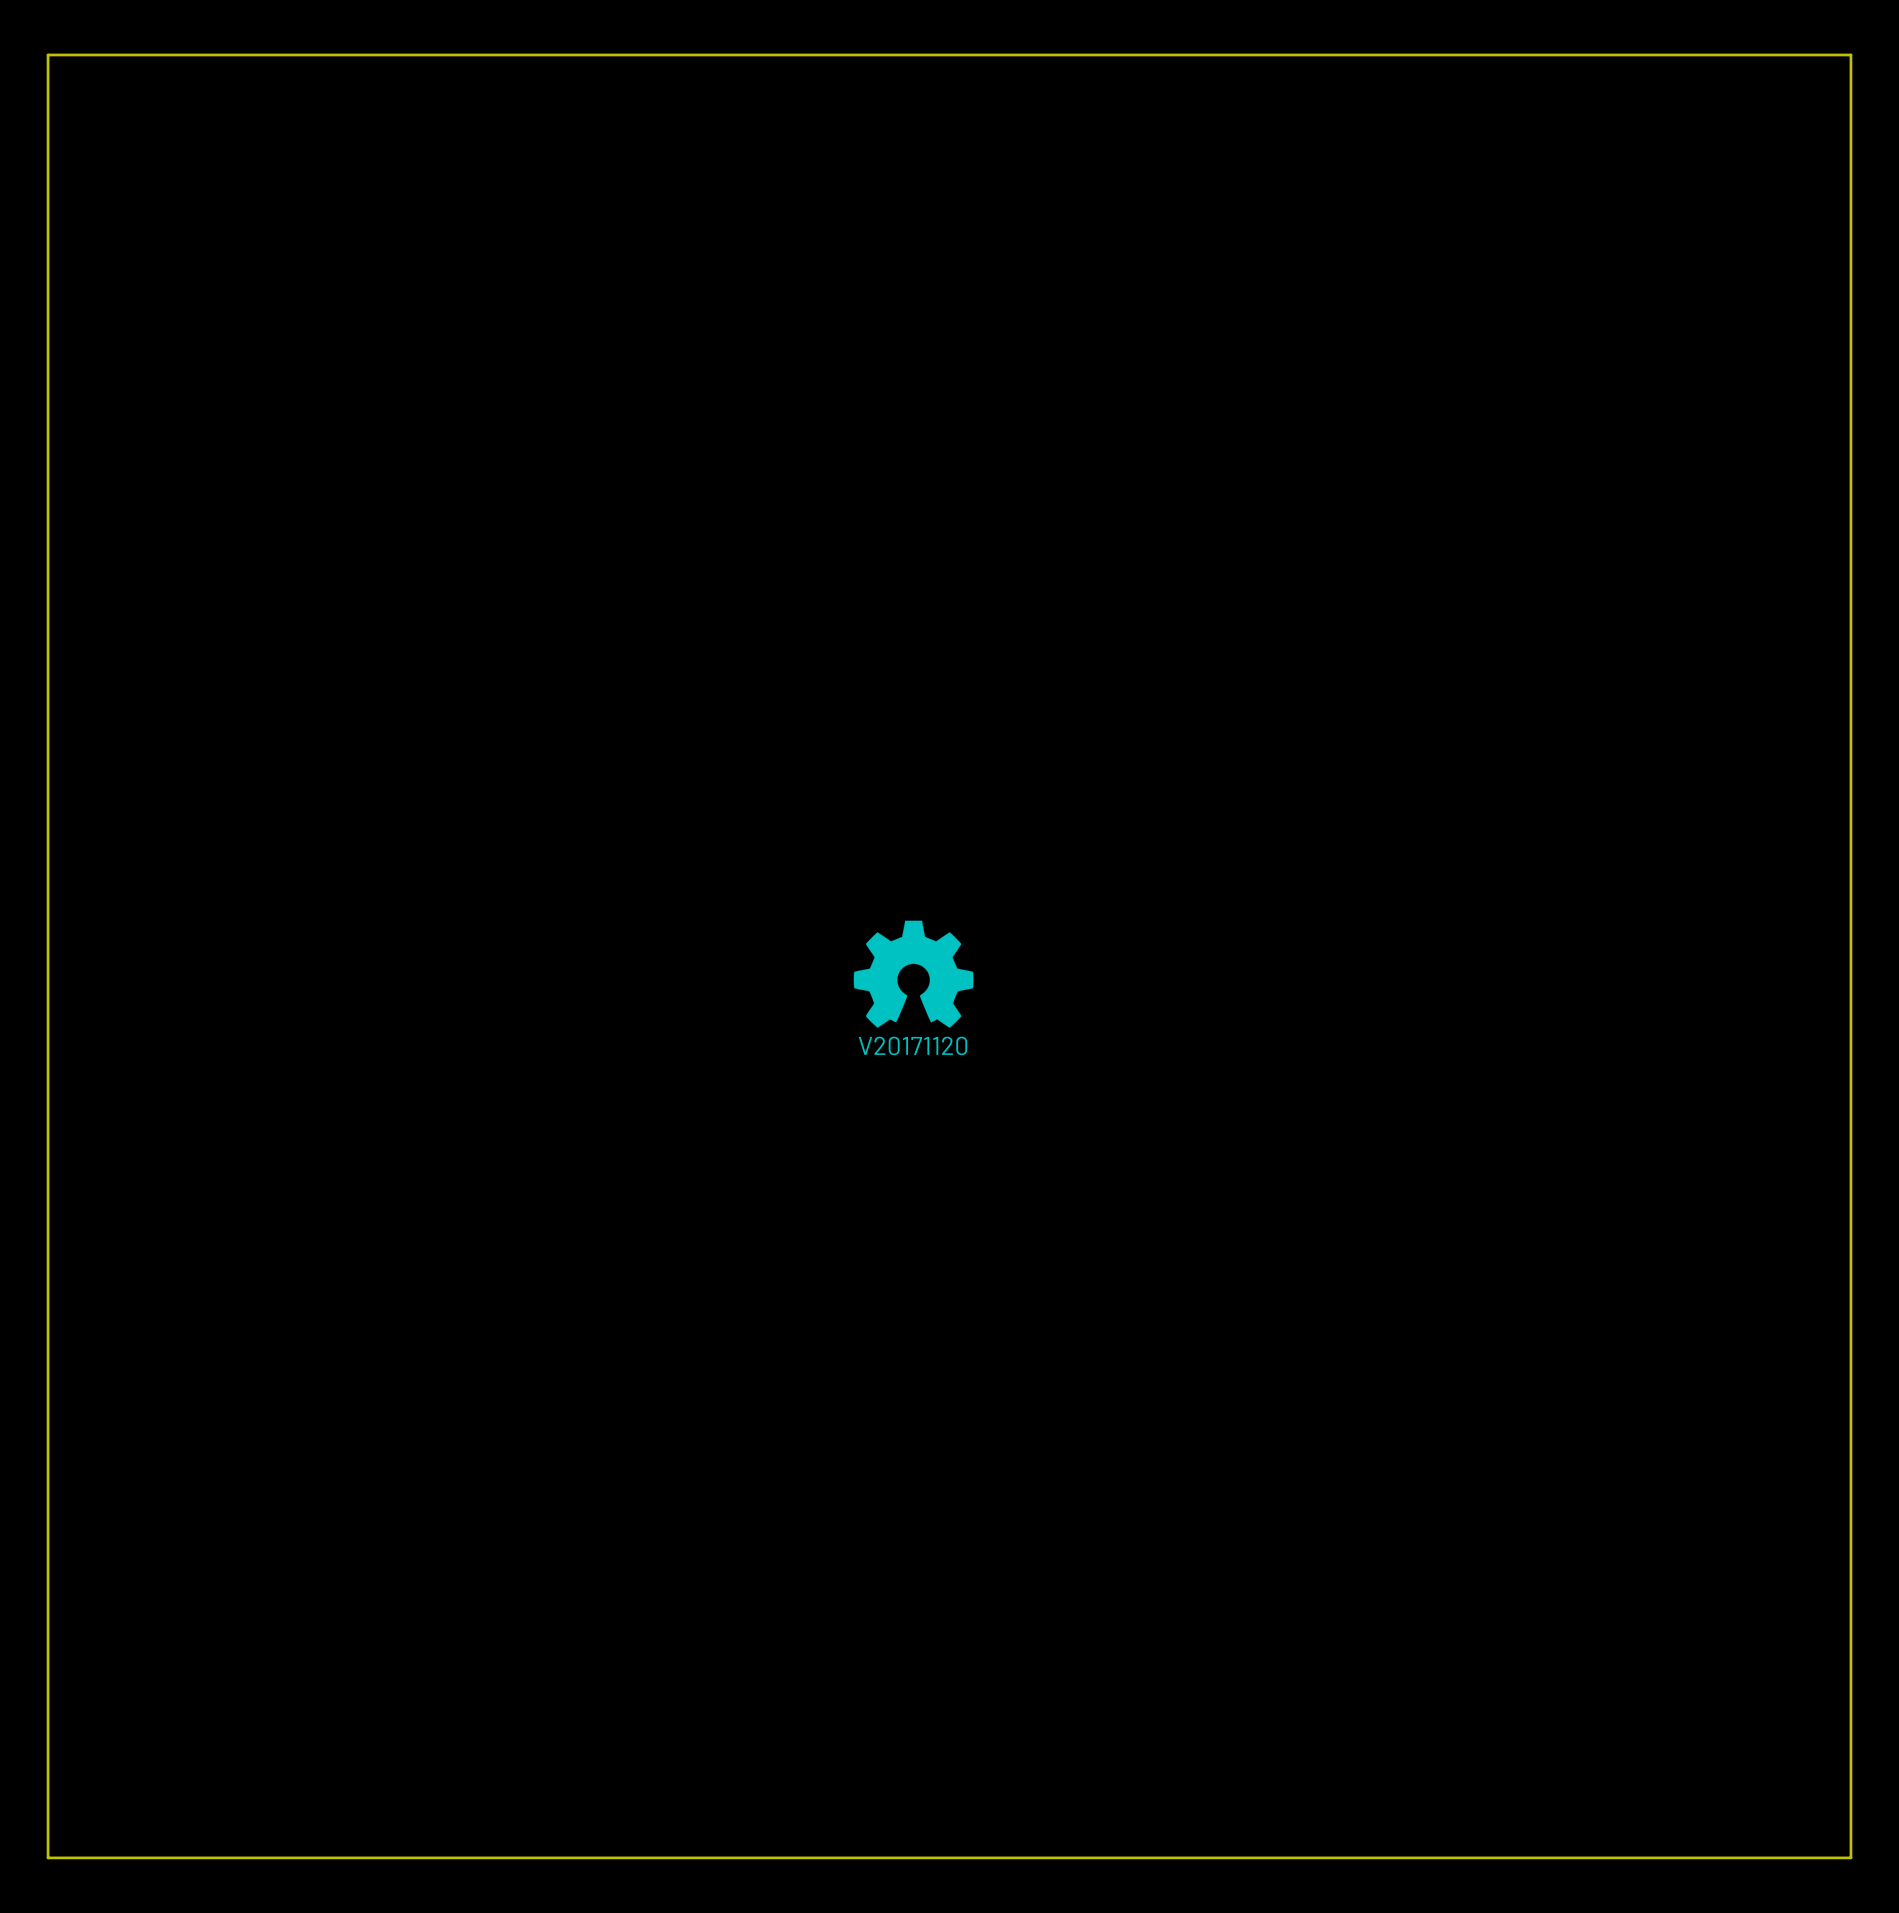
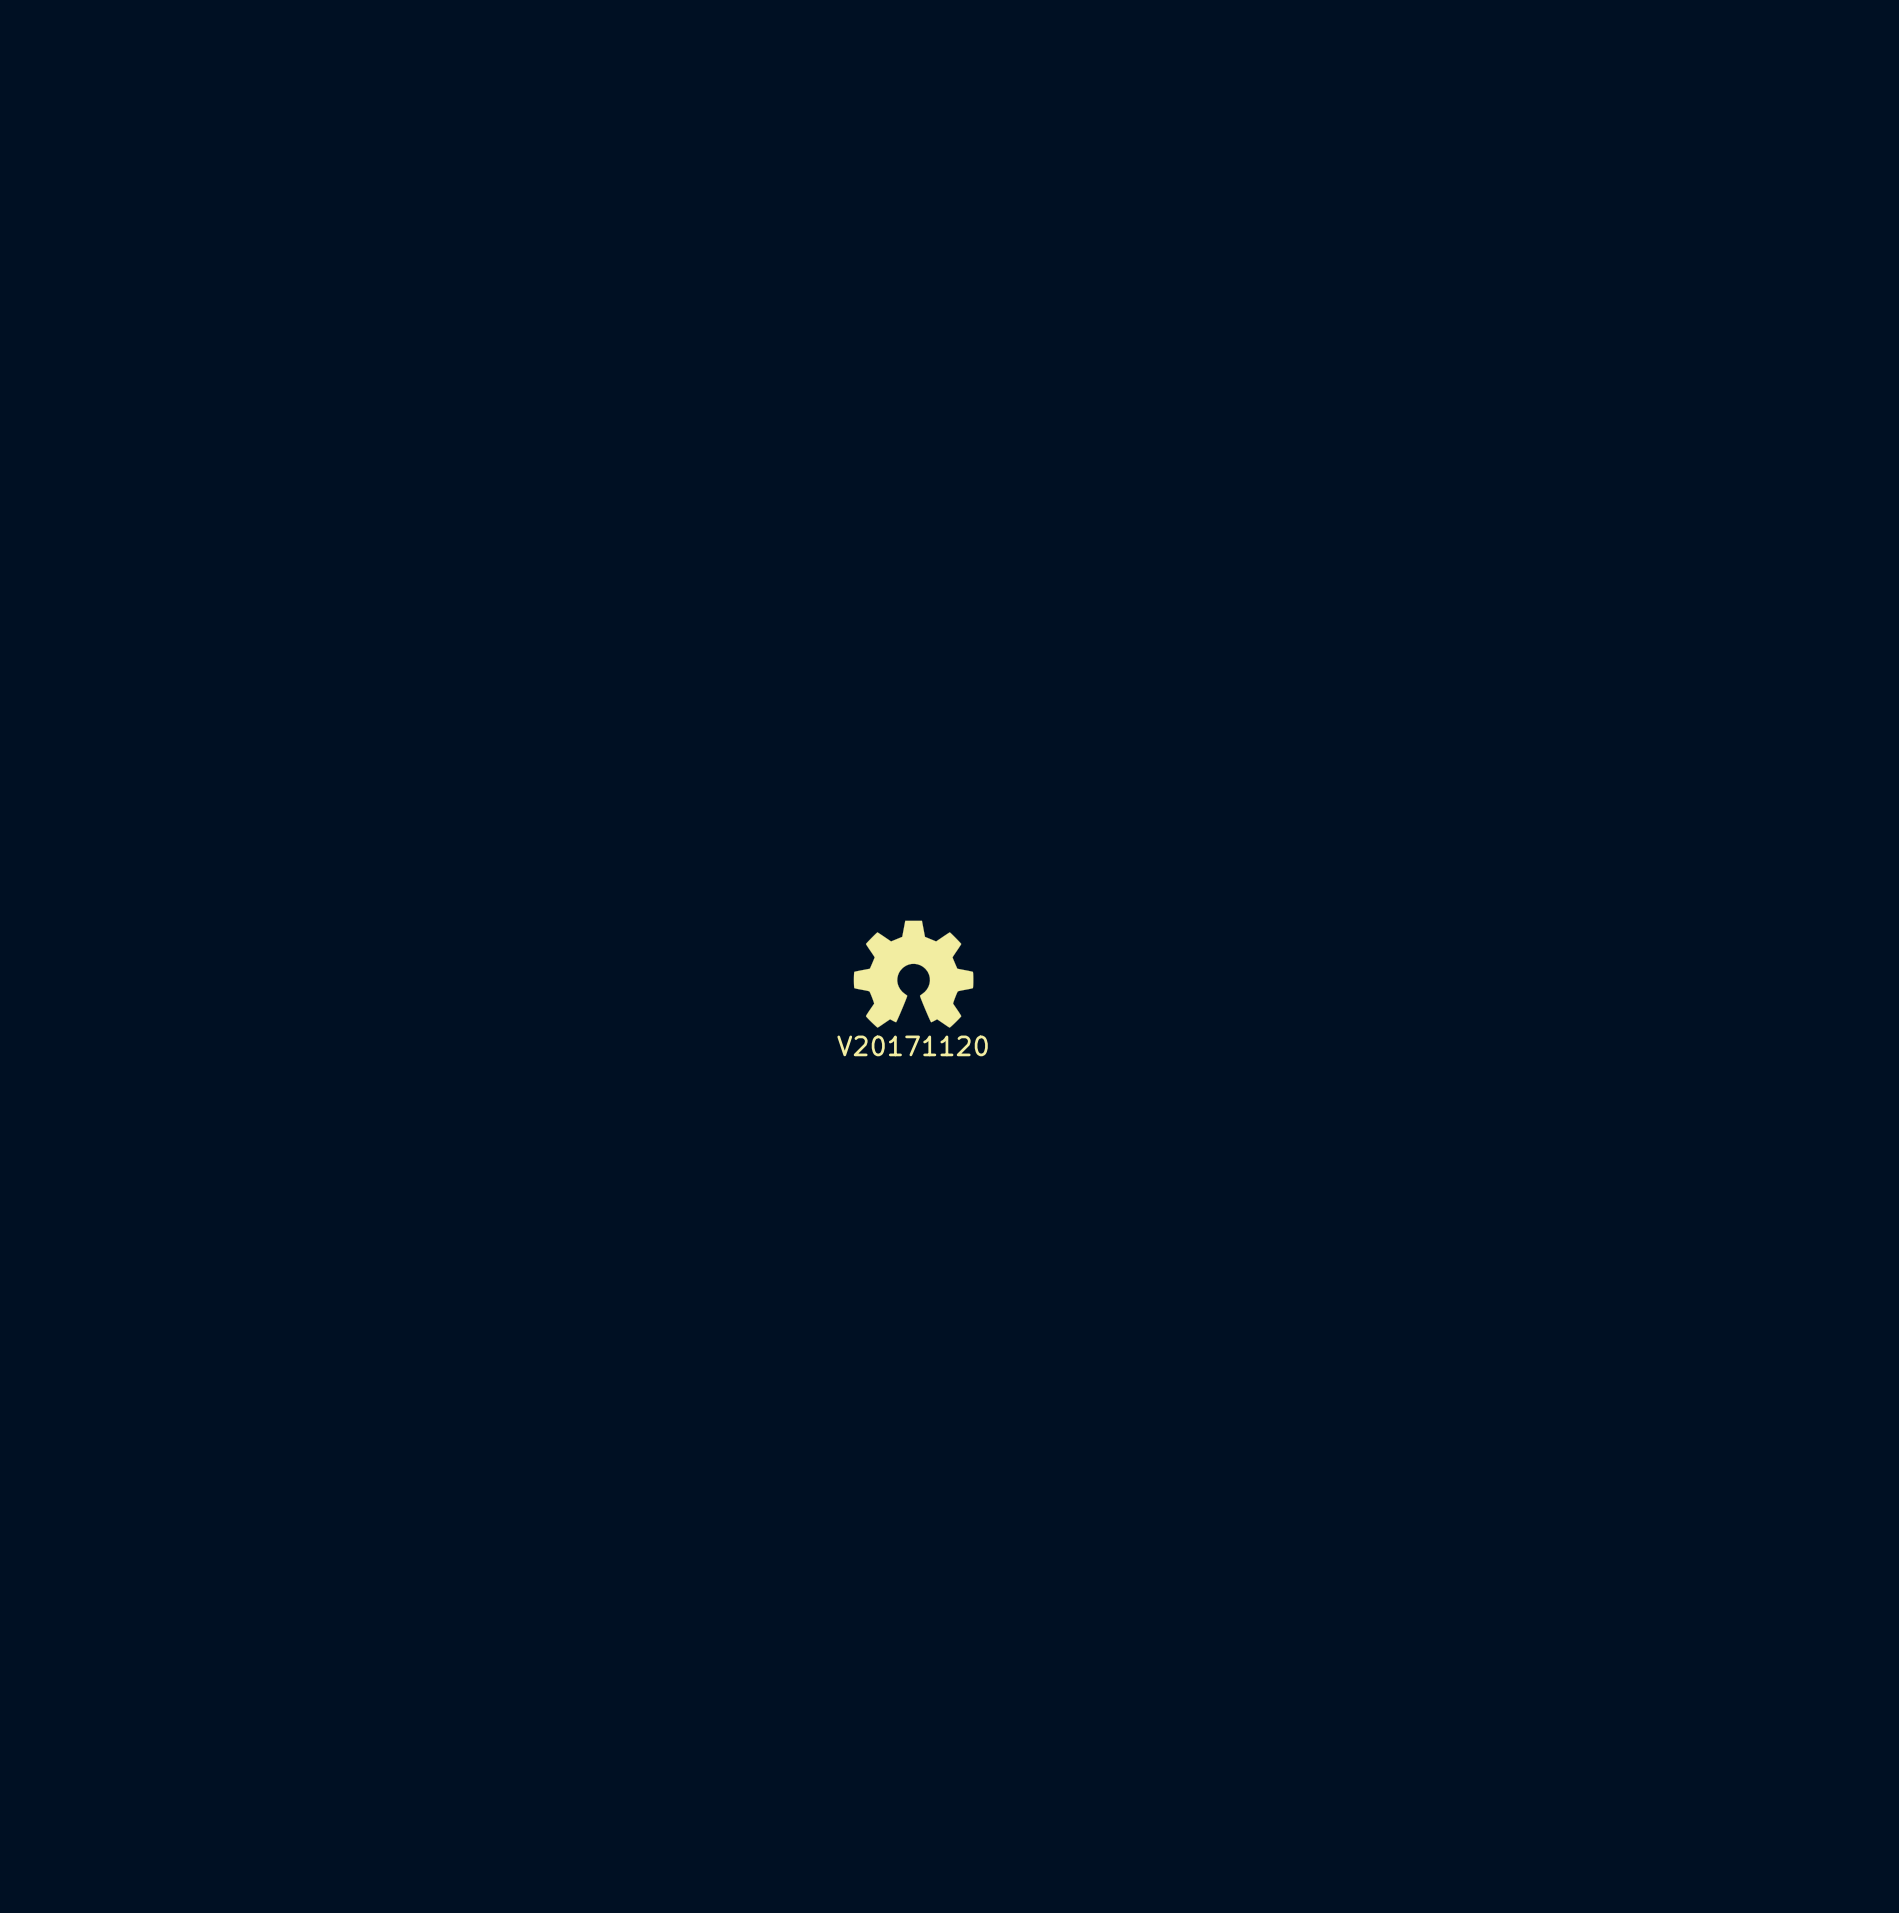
board edge: (48, 54) (48, 1857) (1850, 1857) (1850, 54) (48, 54) -> none

